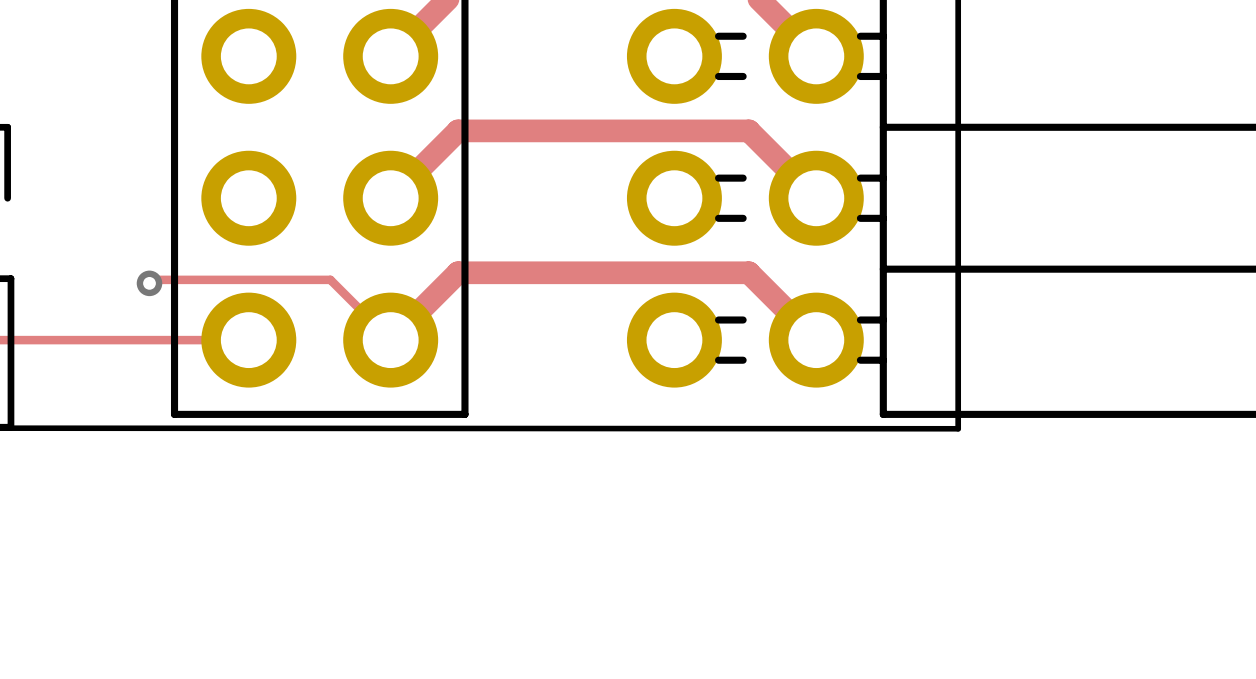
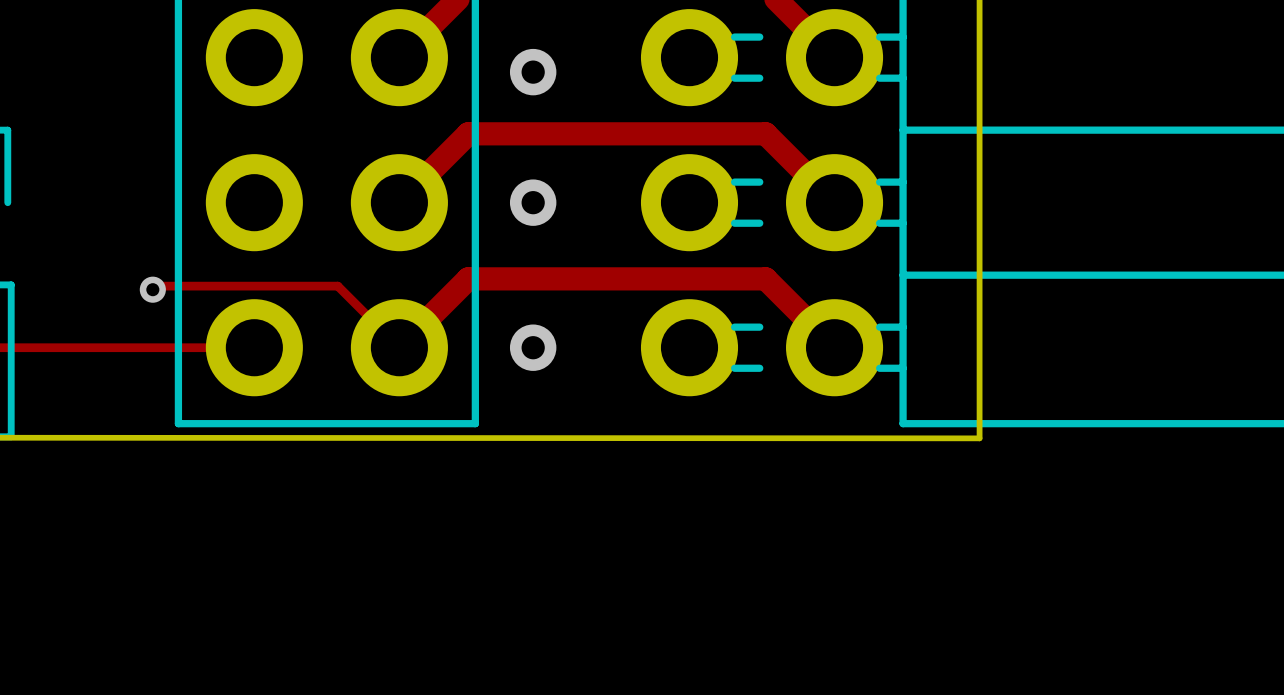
via: none -> (533, 72)
via: none -> (533, 202)
via: none -> (533, 347)

